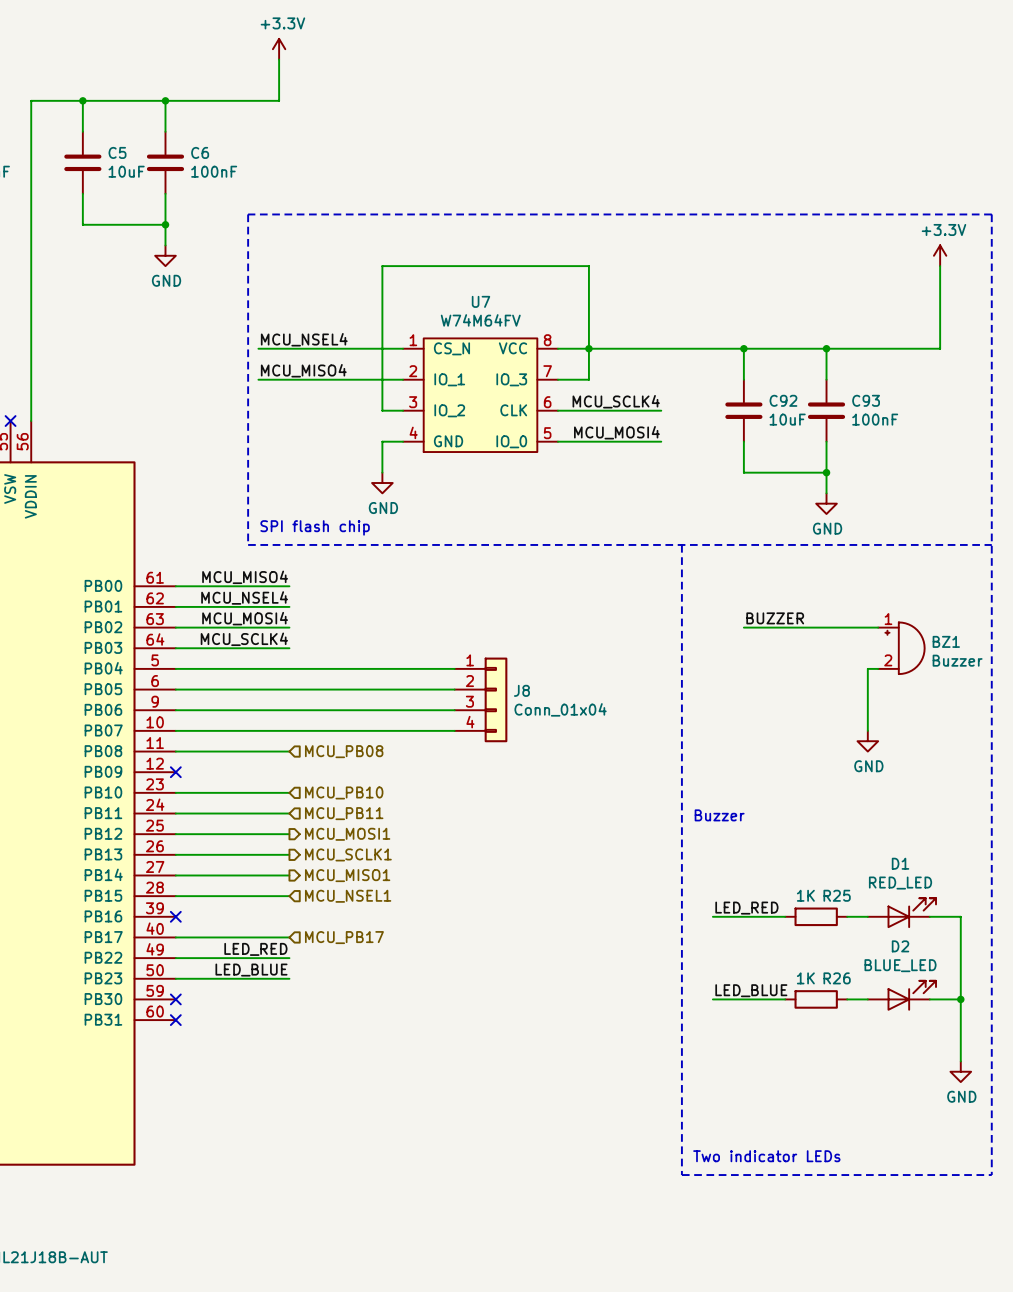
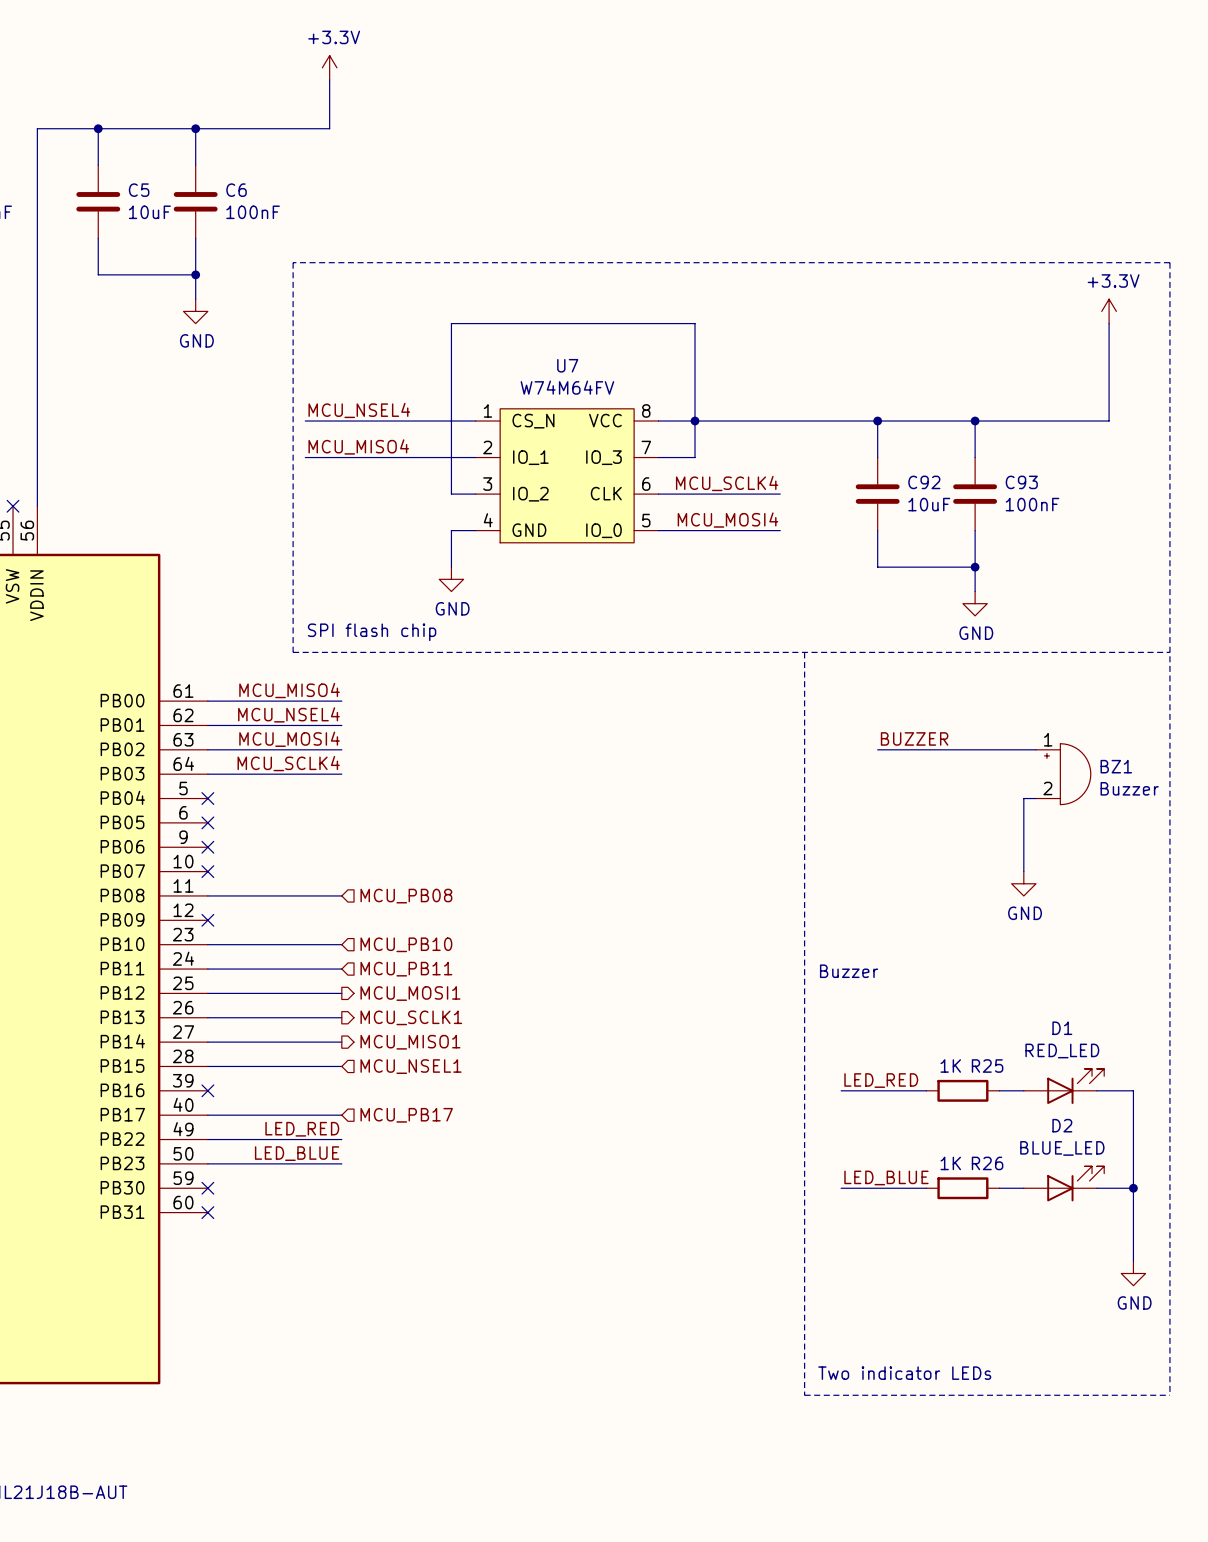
wire: (175, 668) (454, 668) -> none
no-connect mark: none -> (207, 798)
wire: (175, 689) (454, 689) -> none
no-connect mark: none -> (207, 822)
J8: Conn_01x04 (481, 699) -> none
wire: (175, 710) (454, 710) -> none
no-connect mark: none -> (207, 847)
wire: (175, 730) (454, 730) -> none
no-connect mark: none -> (207, 871)

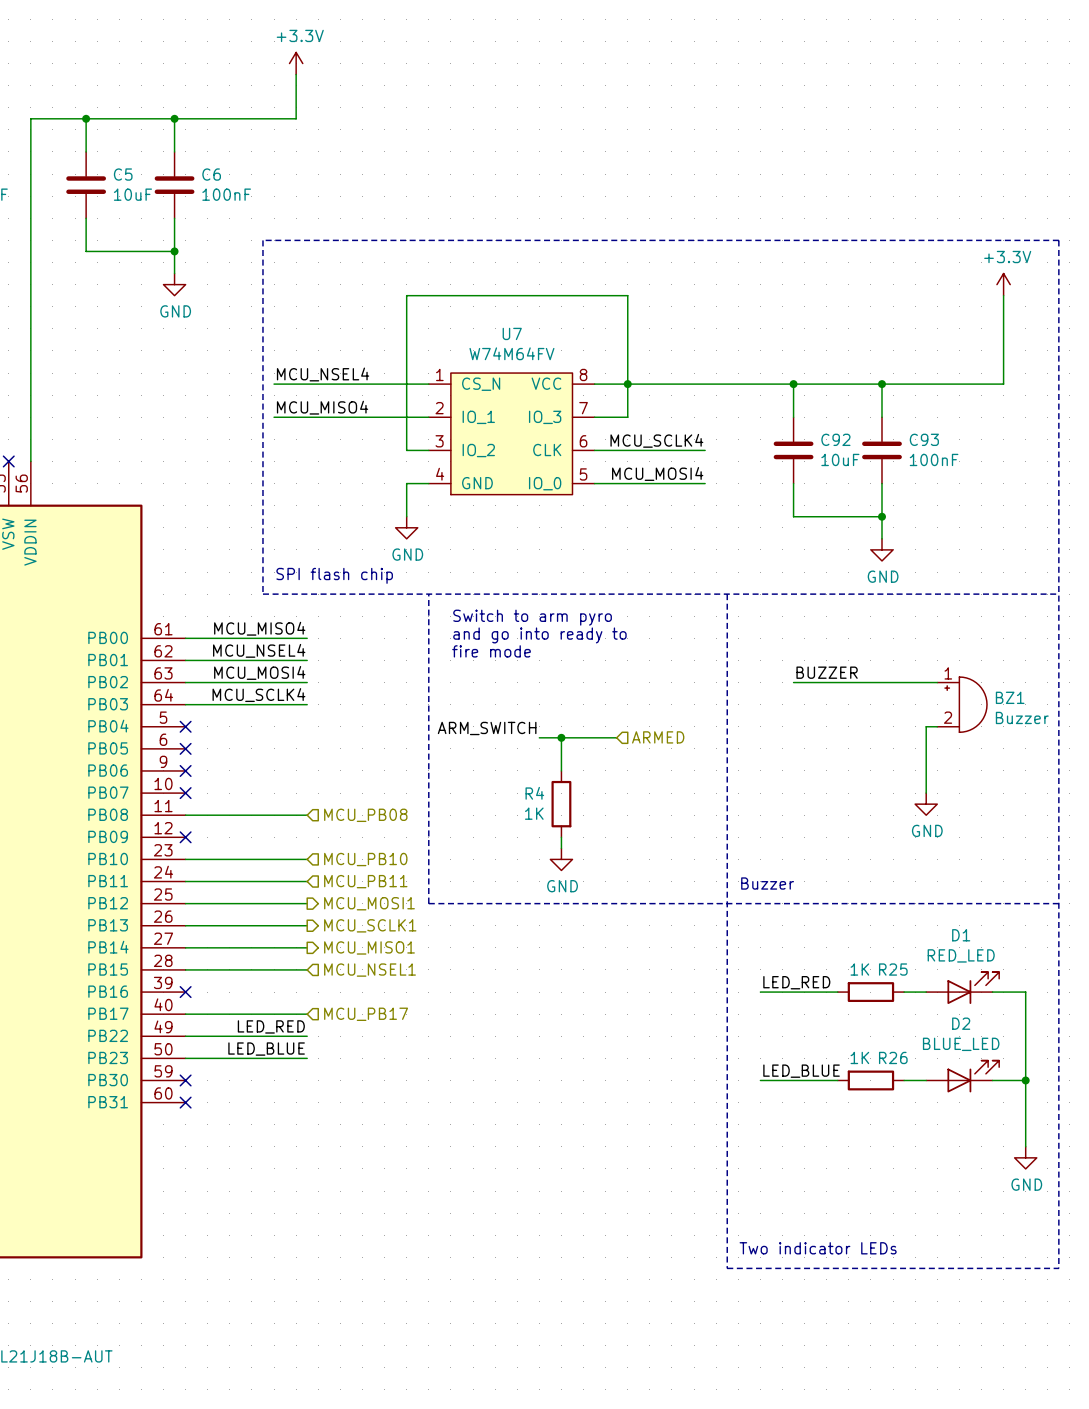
line: none -> (428, 594) (428, 903) (1058, 903)
text: none -> Switch to arm pyro (532, 617)
text: none -> and go into ready to (539, 635)
text: none -> fire mode (491, 651)
label: none -> ARM_SWITCH (487, 728)
wire: none -> (539, 737) (616, 737)
wire: none -> (561, 737) (561, 770)
junction: none -> (561, 737)
hierarchical label: none -> ARMED (658, 737)
R4: none -> 1K (561, 804)
wire: none -> (561, 837) (561, 848)
power symbol: none -> GND (561, 859)

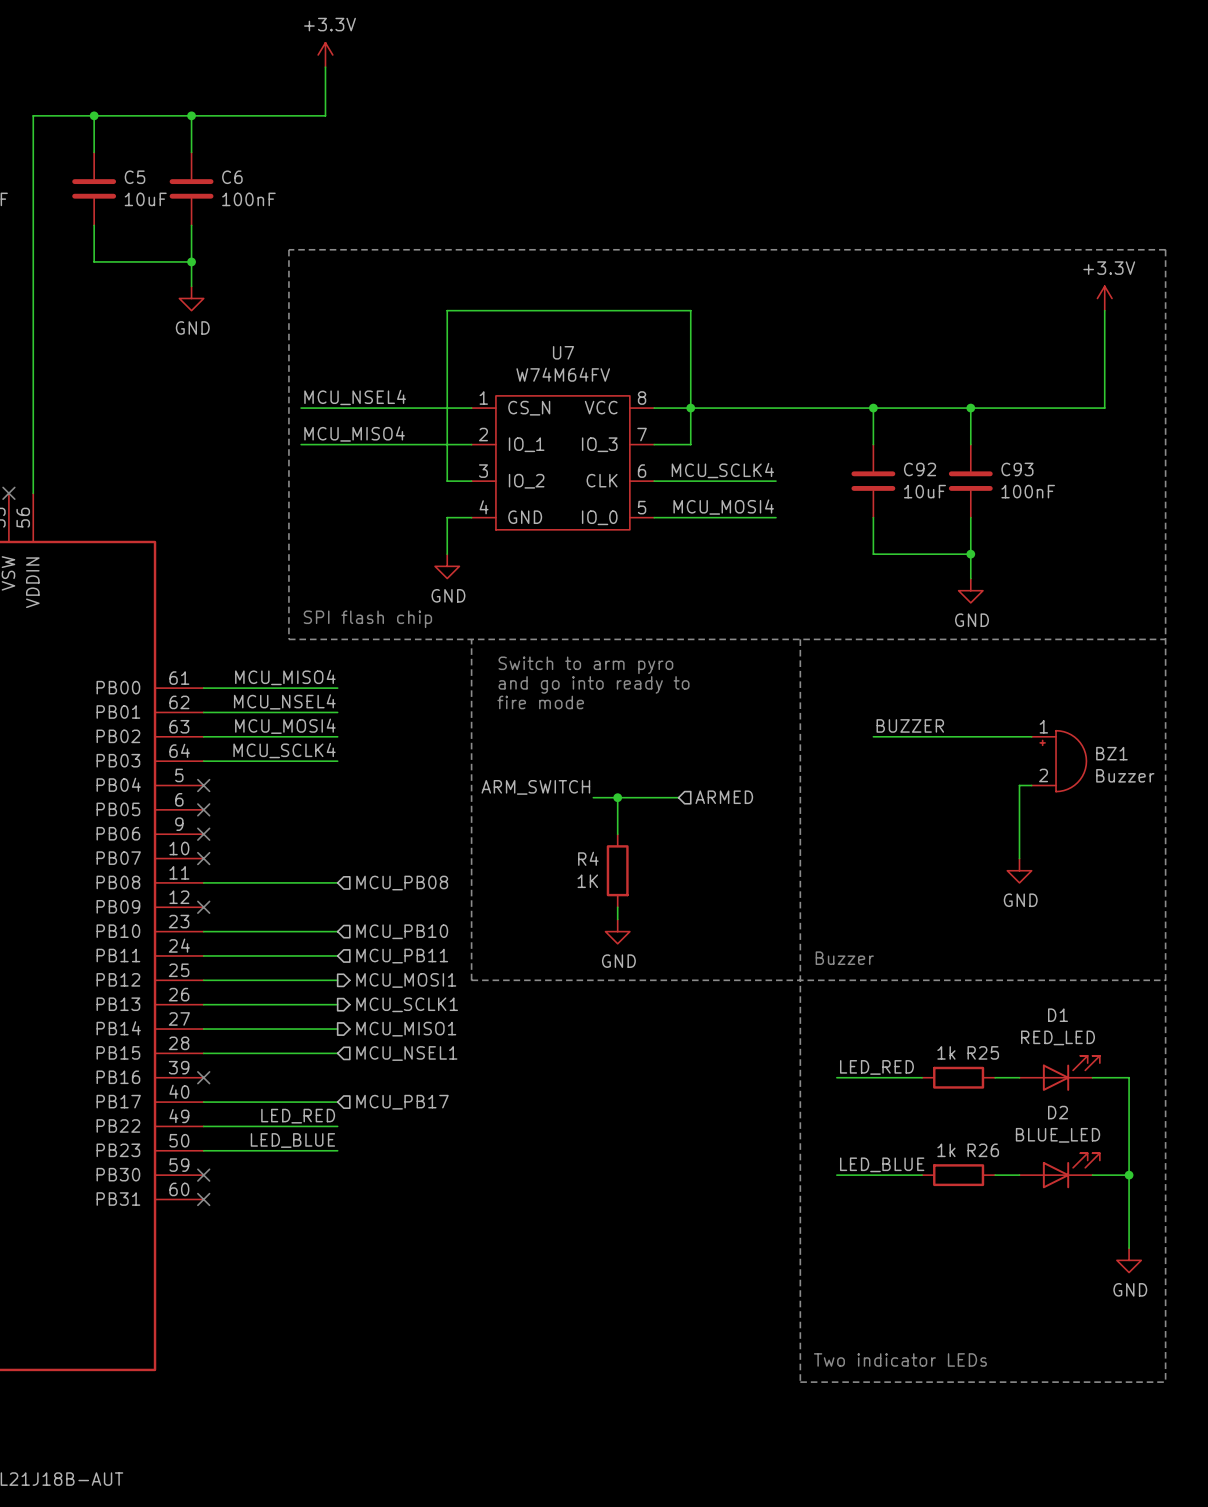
R25 value: 1K (859, 969) -> 1k (946, 1052)
R26 value: 1K (859, 1057) -> 1k (946, 1150)

